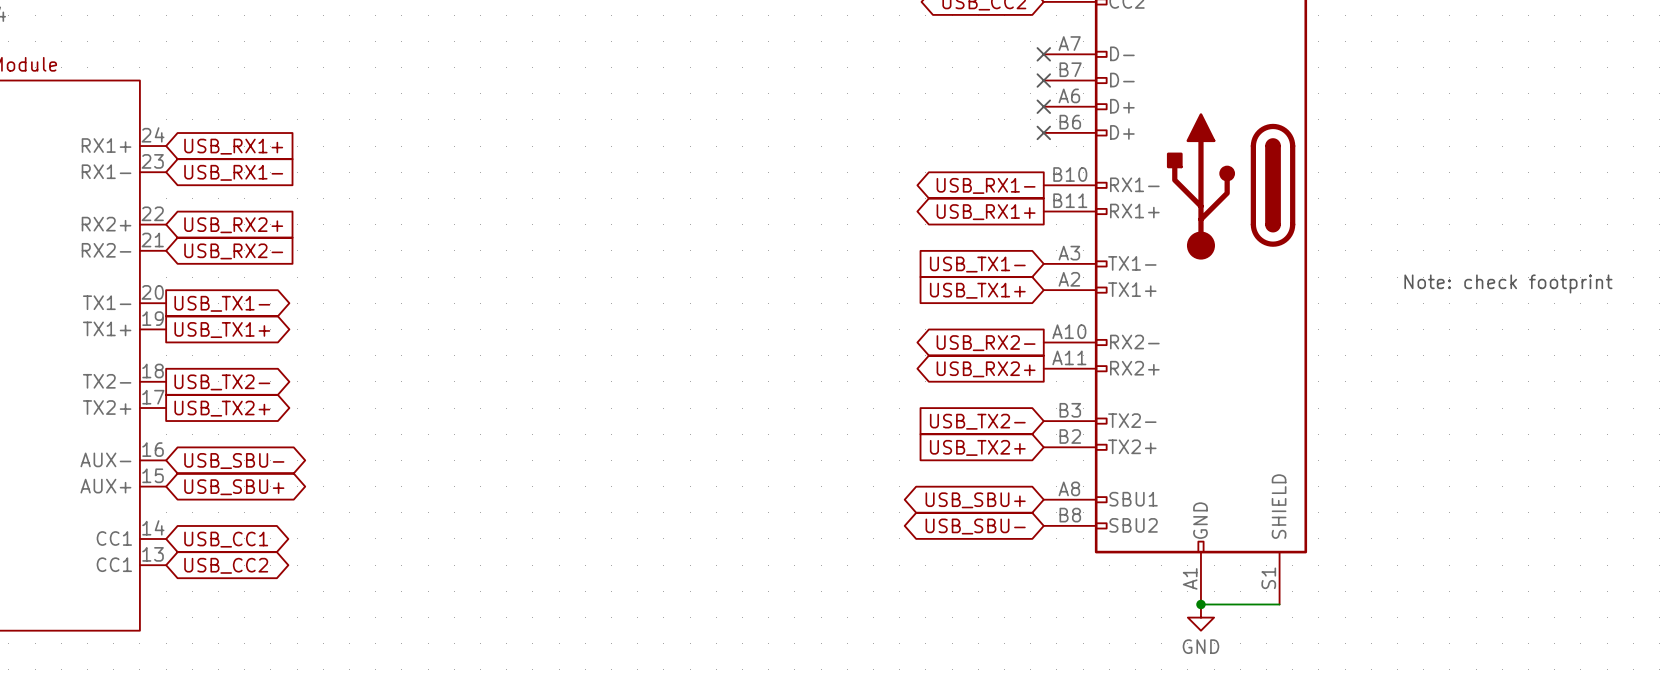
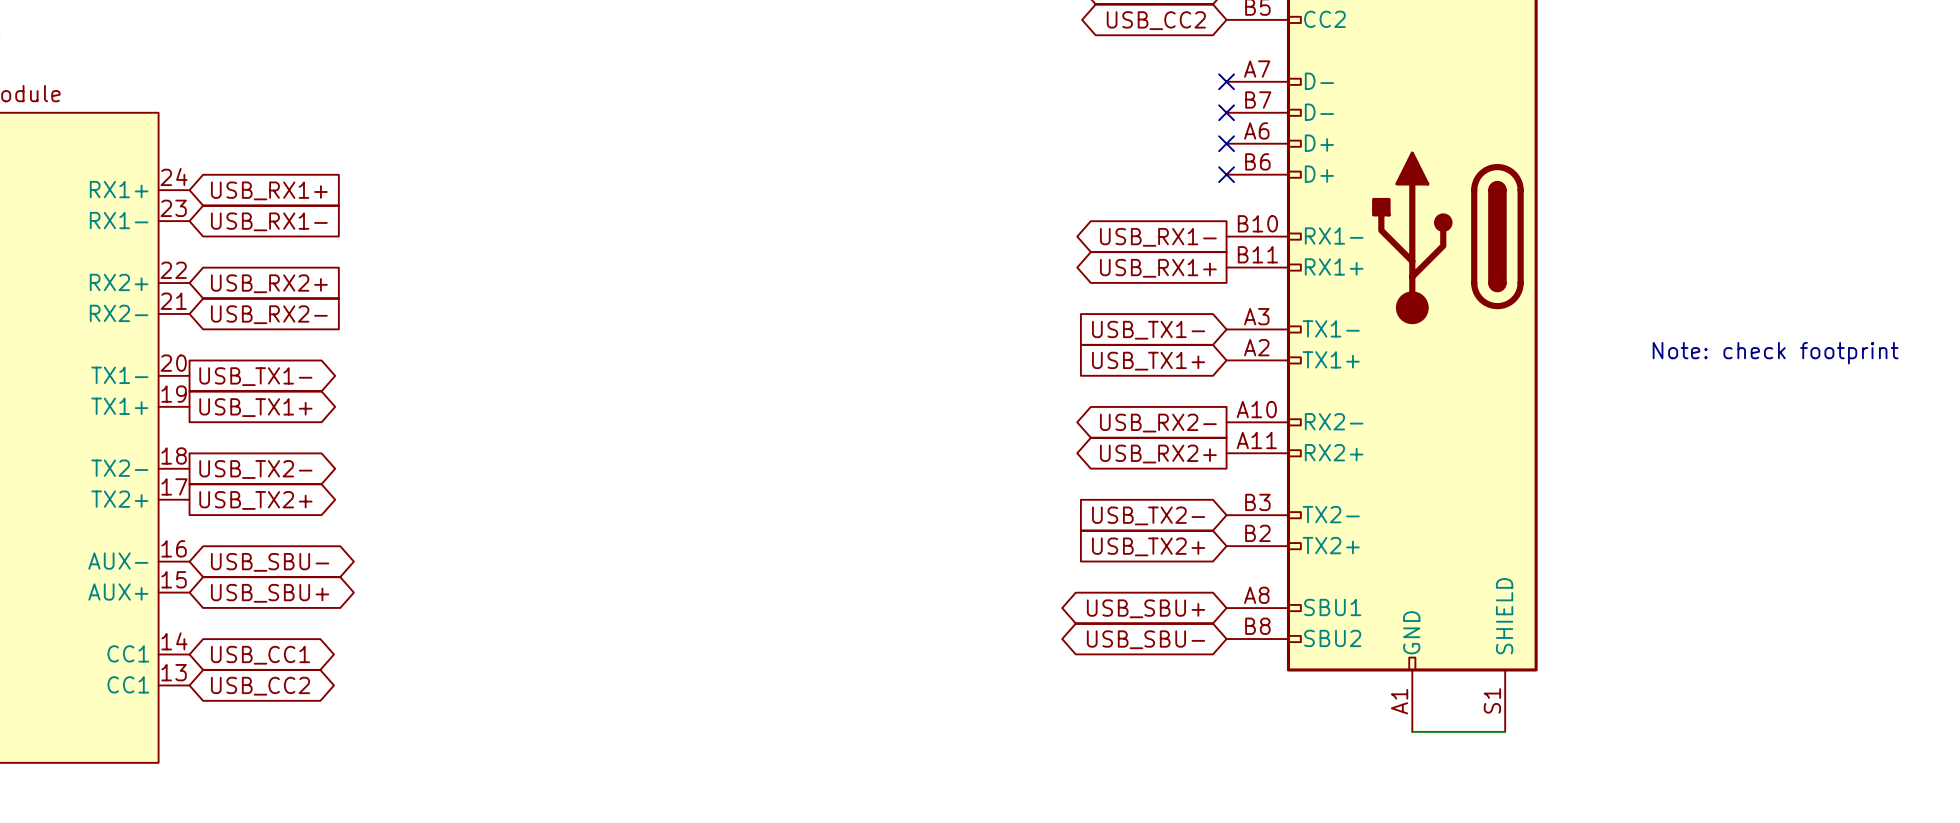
junction: (1200, 604) -> none
power symbol: GND (1200, 617) -> none

